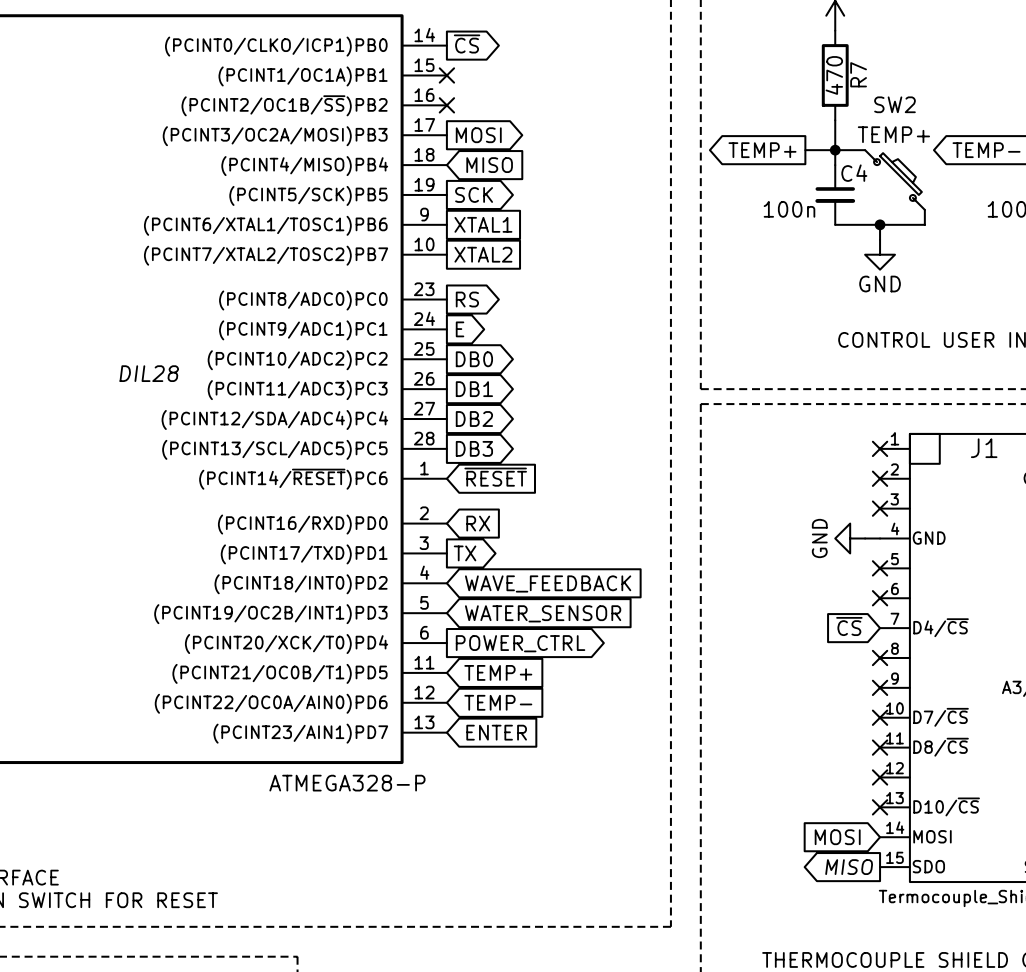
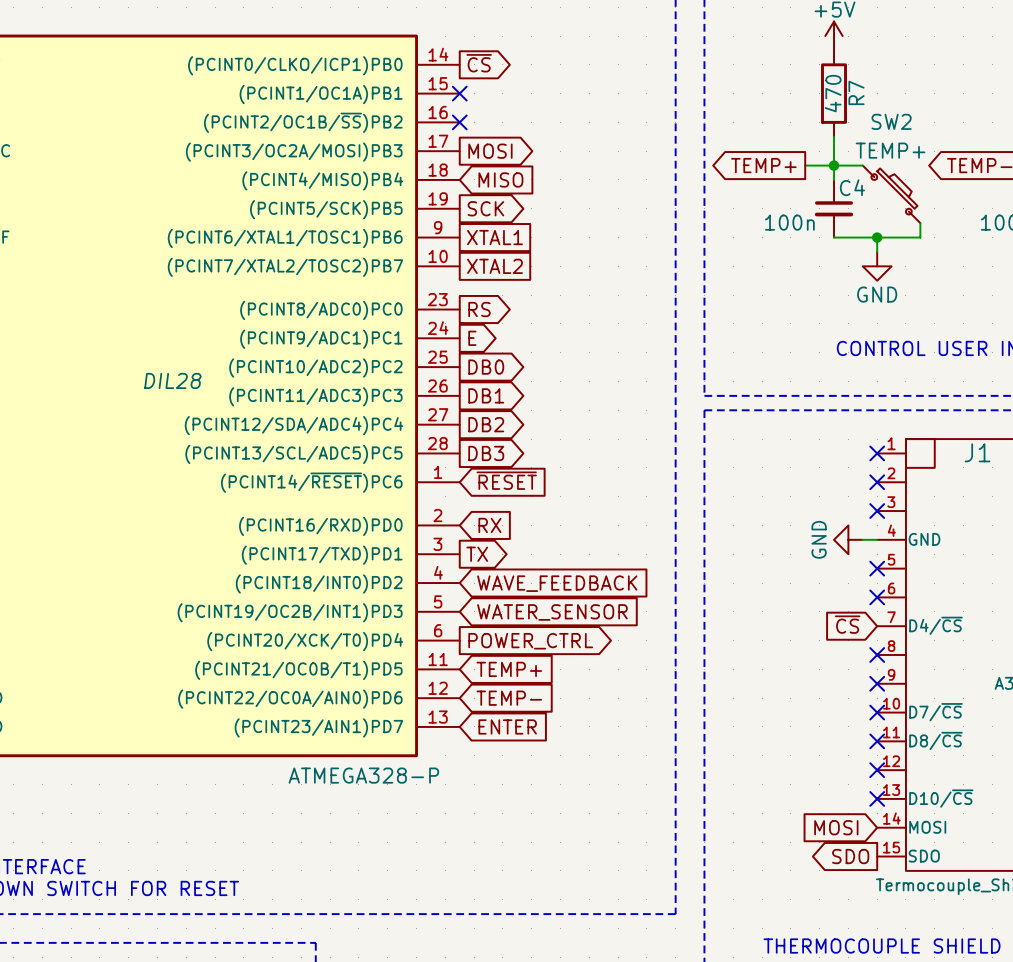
global label: MISO (849, 867) -> SDO (850, 856)

